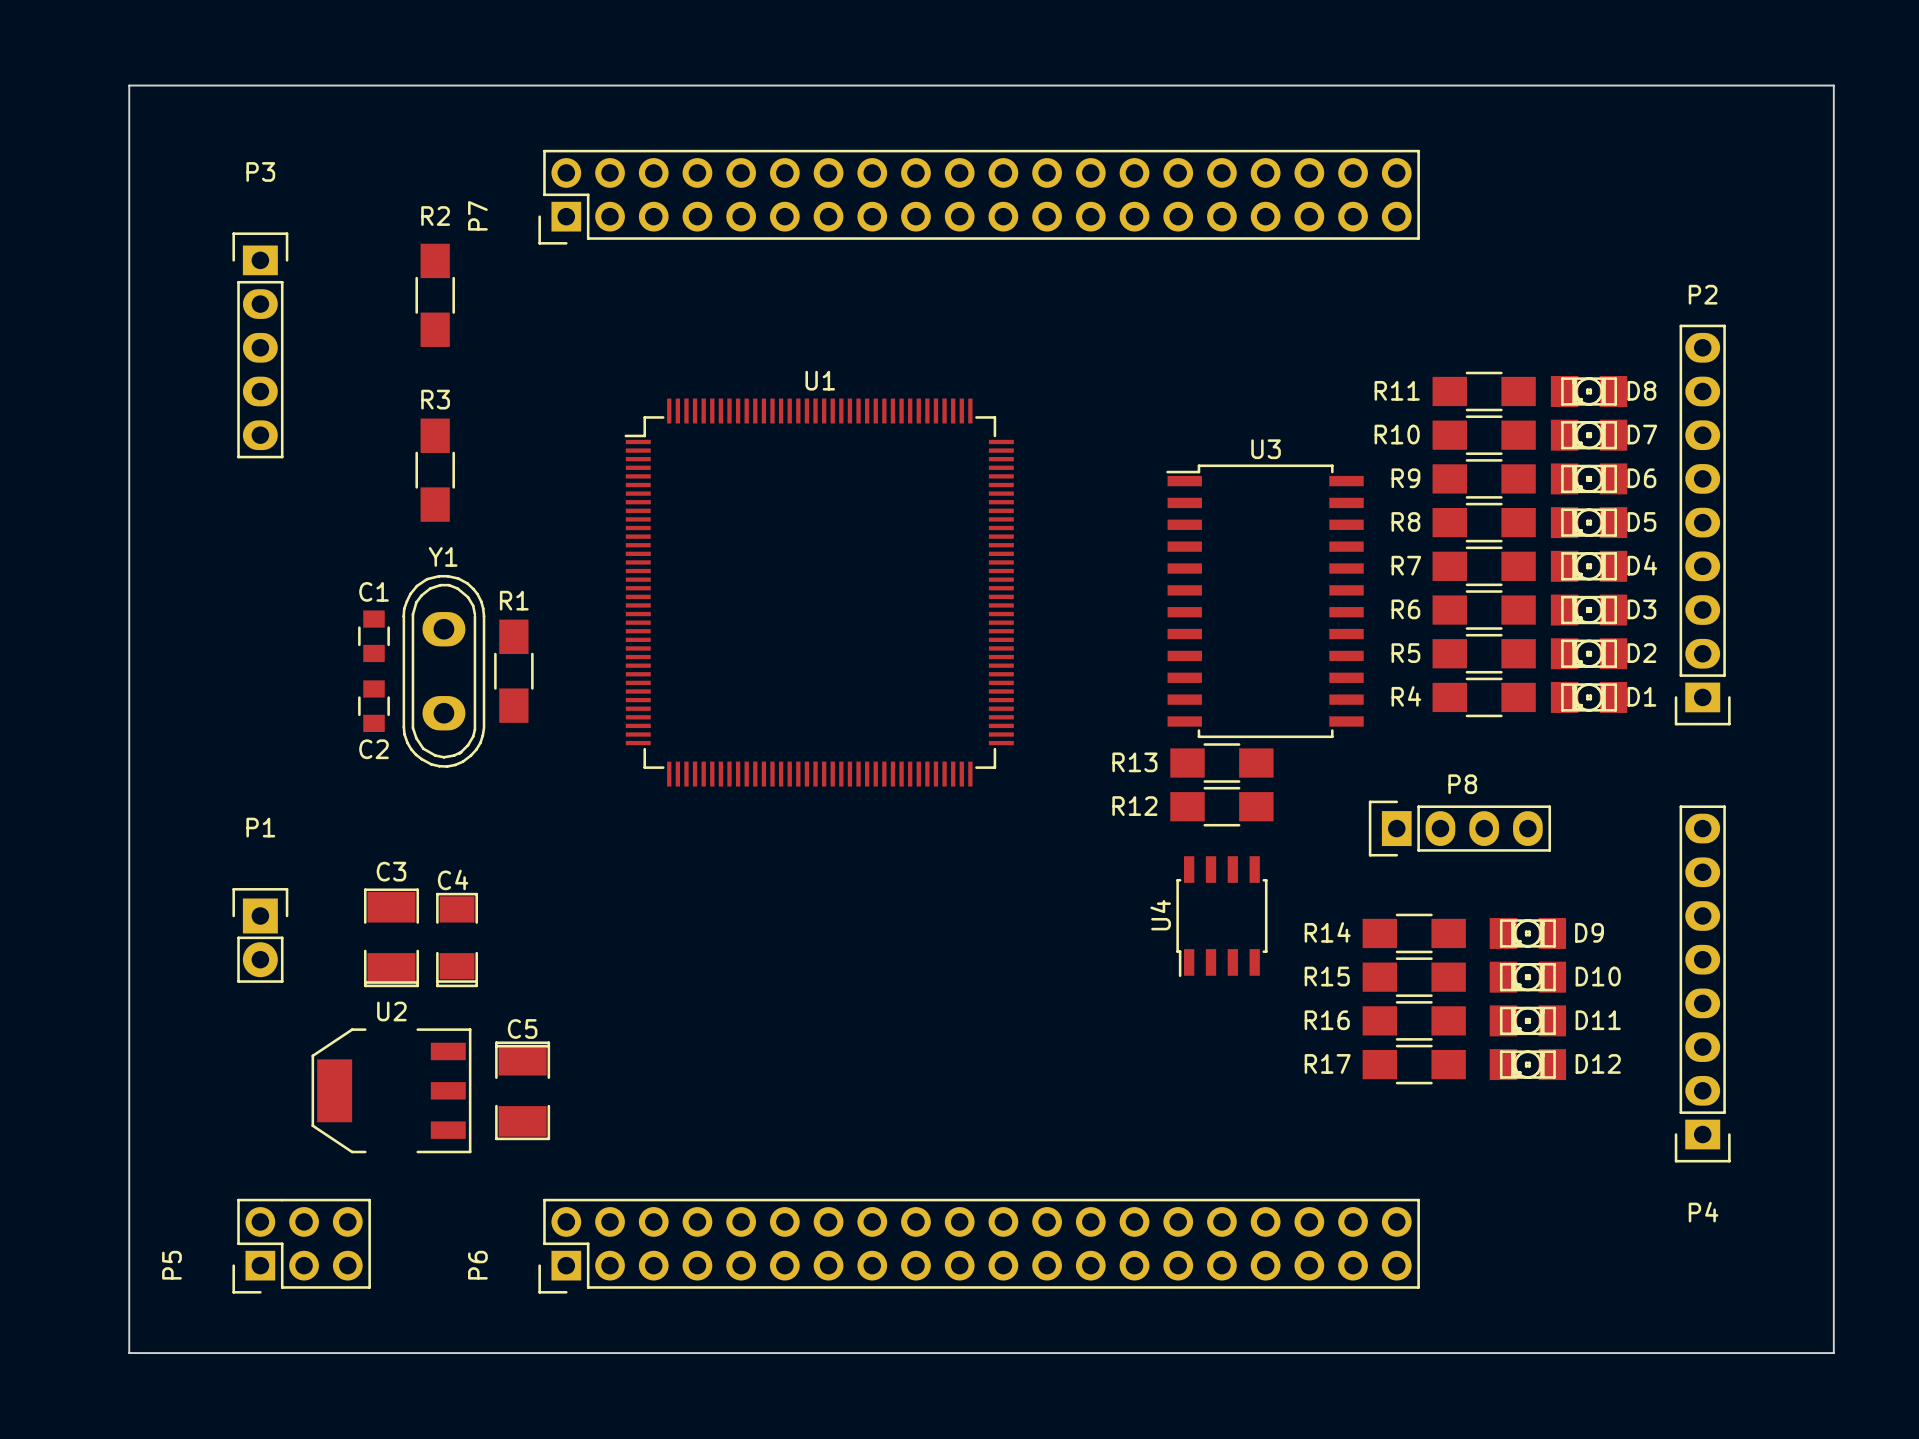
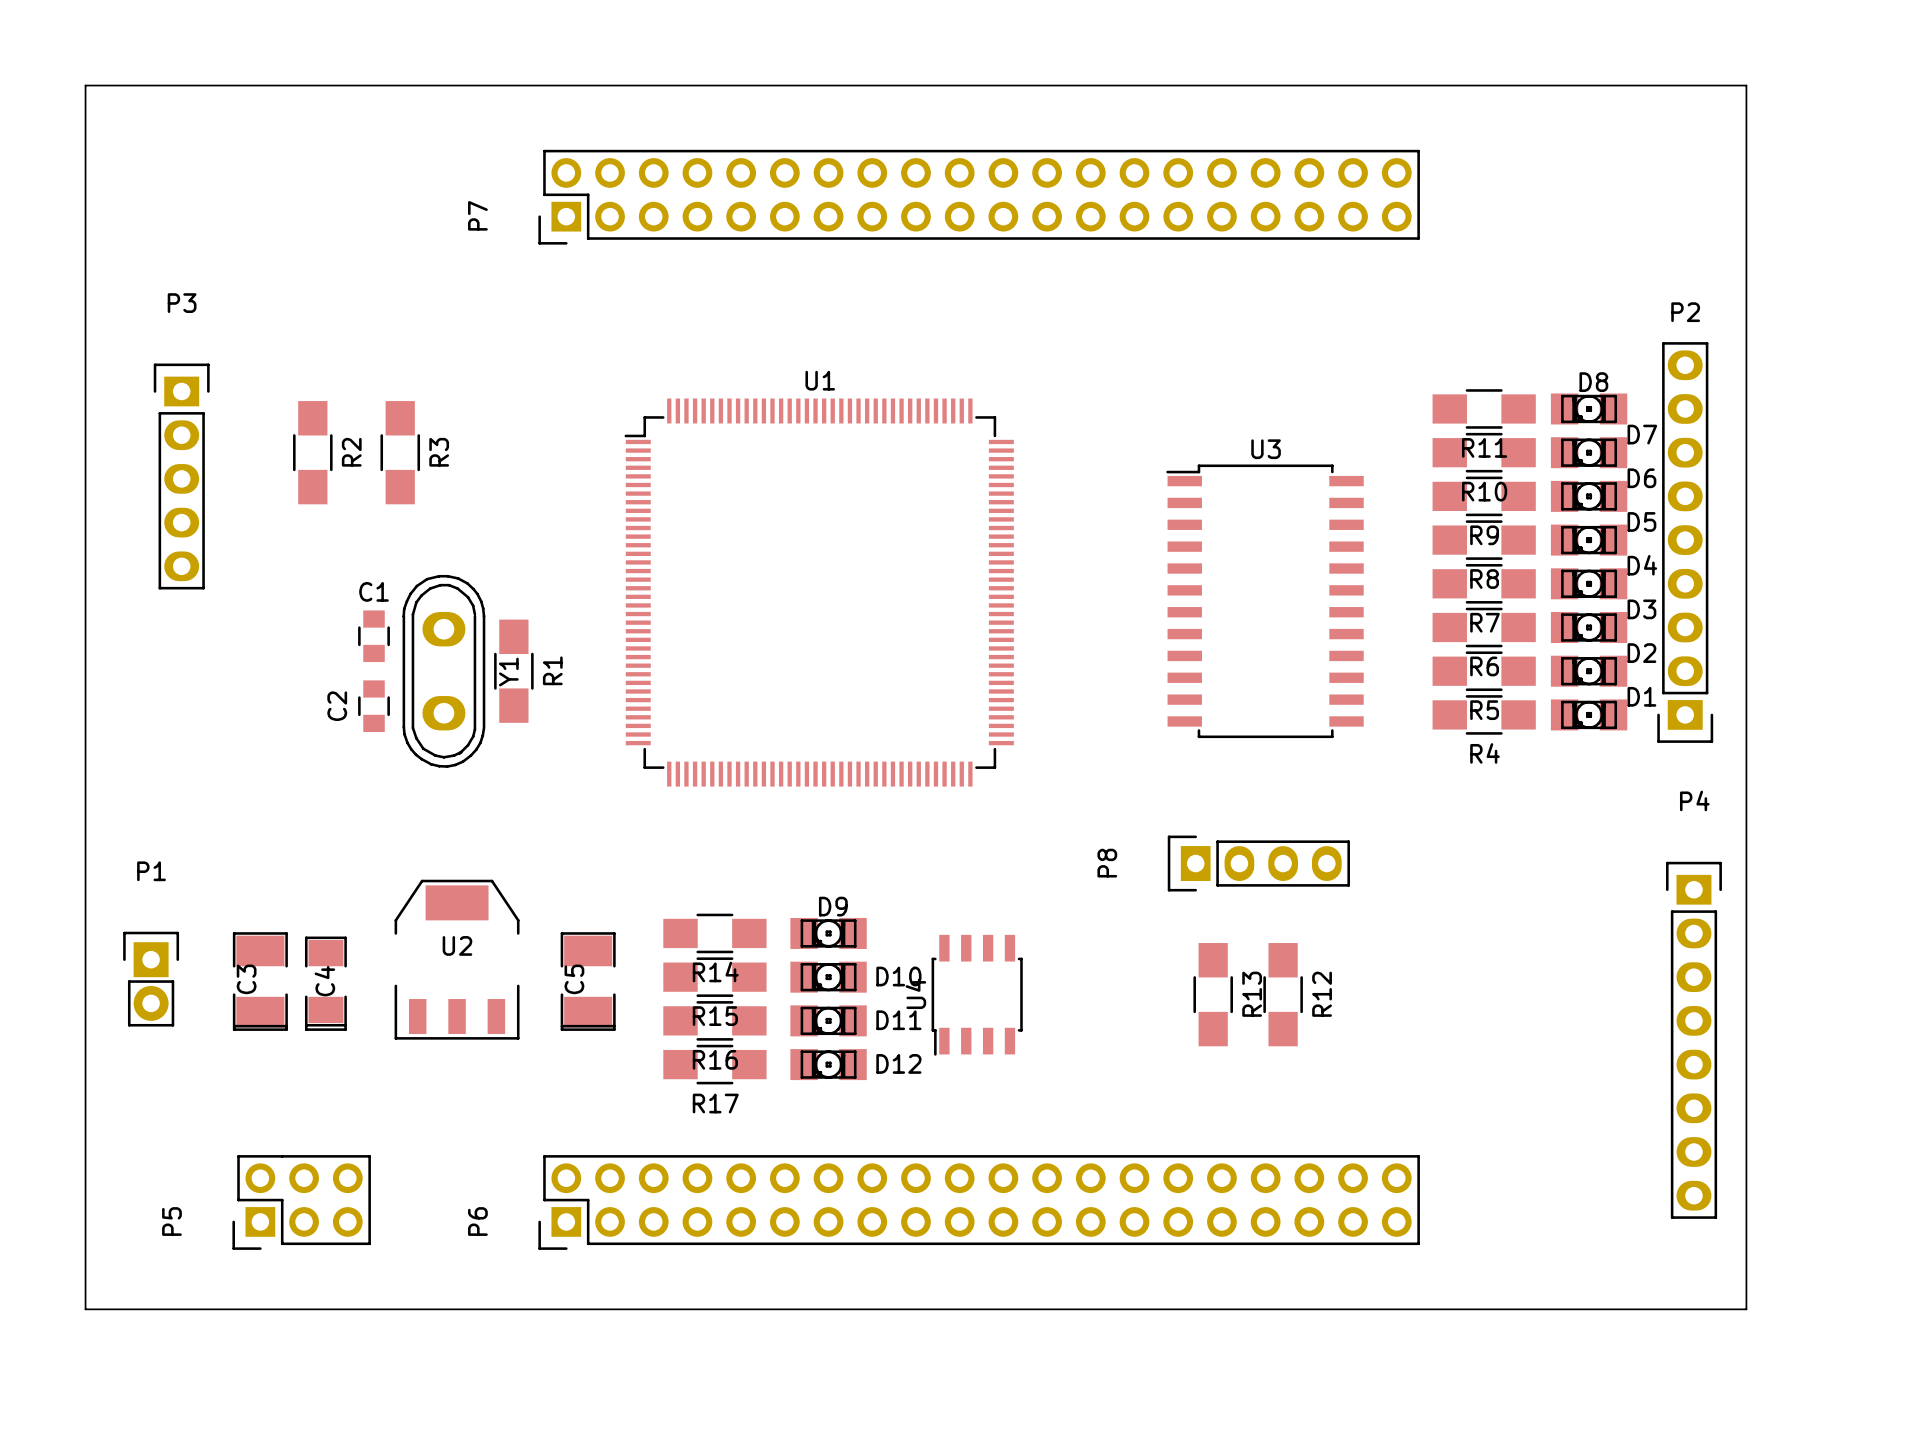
board edge: (129, 85) (129, 1353) (1833, 1353) (1833, 85) (1746, 85) -> (129, 85) (85, 85) (85, 1309) (1746, 1309) (1746, 85)
R2 name rotation: 0° (435, 216) -> 90° counterclockwise (351, 452)
R2 name position: R2 (435, 216) -> R2 (351, 452)
R2 position: (435, 295) -> (312, 452)
P3 position: (260, 345) -> (181, 476)
R11 name position: R11 (1397, 390) -> R11 (1484, 447)
D8 name position: D8 (1641, 390) -> D8 (1593, 382)
R11 position: (1484, 391) -> (1484, 408)
D8 position: (1589, 391) -> (1589, 408)
R3 name rotation: 0° (435, 399) -> 90° counterclockwise (439, 452)
R3 name position: R3 (435, 399) -> R3 (439, 452)
R10 name position: R10 (1397, 434) -> R10 (1484, 491)
R10 position: (1484, 435) -> (1484, 452)
D7 position: (1589, 435) -> (1589, 452)
R3 position: (435, 470) -> (400, 452)
R9 name position: R9 (1405, 478) -> R9 (1484, 535)
R9 position: (1484, 478) -> (1484, 496)
D6 position: (1589, 478) -> (1589, 496)
R8 name position: R8 (1405, 521) -> R8 (1484, 579)
R8 position: (1484, 522) -> (1484, 540)
D5 position: (1589, 522) -> (1589, 540)
P2 position: (1702, 525) -> (1685, 542)
Y1 name rotation: 0° (443, 556) -> 90° counterclockwise (508, 672)
Y1 name position: Y1 (443, 556) -> Y1 (508, 672)
R7 name position: R7 (1406, 565) -> R7 (1484, 622)
R7 position: (1484, 566) -> (1484, 583)
D4 position: (1589, 566) -> (1589, 583)
R1 name rotation: 0° (514, 600) -> 90° counterclockwise (552, 670)
R1 name position: R1 (514, 600) -> R1 (552, 670)
R6 name position: R6 (1405, 609) -> R6 (1484, 666)
R6 position: (1484, 610) -> (1484, 627)
D3 position: (1589, 610) -> (1589, 627)
R5 name position: R5 (1405, 653) -> R5 (1484, 710)
R5 position: (1484, 653) -> (1484, 671)
D2 position: (1589, 653) -> (1589, 671)
R4 name position: R4 (1406, 696) -> R4 (1484, 753)
R4 position: (1484, 697) -> (1484, 714)
D1 position: (1589, 697) -> (1589, 714)
C2 name rotation: 0° (374, 749) -> 90° counterclockwise (337, 706)
C2 name position: C2 (374, 749) -> C2 (337, 706)
R13 name position: R13 (1134, 762) -> R13 (1252, 994)
R13 rotation: 0° (1221, 763) -> 90° clockwise (1213, 994)
R13 position: (1221, 763) -> (1213, 994)
P8 name rotation: 0° (1462, 784) -> 90° counterclockwise (1107, 863)
P8 name position: P8 (1462, 784) -> P8 (1107, 863)
R12 name position: R12 (1134, 806) -> R12 (1322, 994)
R12 rotation: 0° (1221, 806) -> 90° clockwise (1283, 994)
R12 position: (1221, 806) -> (1283, 994)
P8 position: (1459, 828) -> (1258, 863)
C3 name rotation: 0° (391, 871) -> 90° counterclockwise (246, 979)
C3 name position: C3 (391, 871) -> C3 (246, 979)
C4 name rotation: 0° (453, 879) -> 90° counterclockwise (324, 981)
C4 name position: C4 (453, 879) -> C4 (324, 981)
U4 position: (1221, 916) -> (977, 995)
R14 name position: R14 (1327, 932) -> R14 (715, 971)
D9 name position: D9 (1589, 932) -> D9 (833, 906)
R14 position: (1414, 933) -> (714, 933)
D9 position: (1527, 933) -> (828, 933)
P1 position: (260, 935) -> (151, 979)
C3 position: (391, 937) -> (260, 981)
C4 position: (457, 940) -> (325, 983)
R15 name position: R15 (1327, 976) -> R15 (715, 1016)
R15 position: (1414, 977) -> (714, 977)
D10 position: (1527, 977) -> (828, 977)
P4 rotation: 0° (1702, 983) -> 180° (1693, 1040)
U2 name position: U2 (391, 1011) -> U2 (457, 945)
R16 name position: R16 (1327, 1020) -> R16 (715, 1059)
R16 position: (1414, 1020) -> (714, 1020)
D11 position: (1527, 1020) -> (828, 1020)
C5 name position: C5 (522, 1028) -> C5 (574, 979)
R17 name position: R17 (1327, 1063) -> R17 (715, 1103)
R17 position: (1414, 1064) -> (714, 1064)
D12 position: (1527, 1064) -> (828, 1064)
U2 rotation: 0° (391, 1090) -> 90° clockwise (457, 959)
U2 position: (391, 1090) -> (457, 959)
C5 rotation: 0° (522, 1090) -> 180° (588, 981)
C5 position: (522, 1090) -> (588, 981)
P5 position: (301, 1246) -> (301, 1202)
P6 position: (979, 1246) -> (979, 1202)

